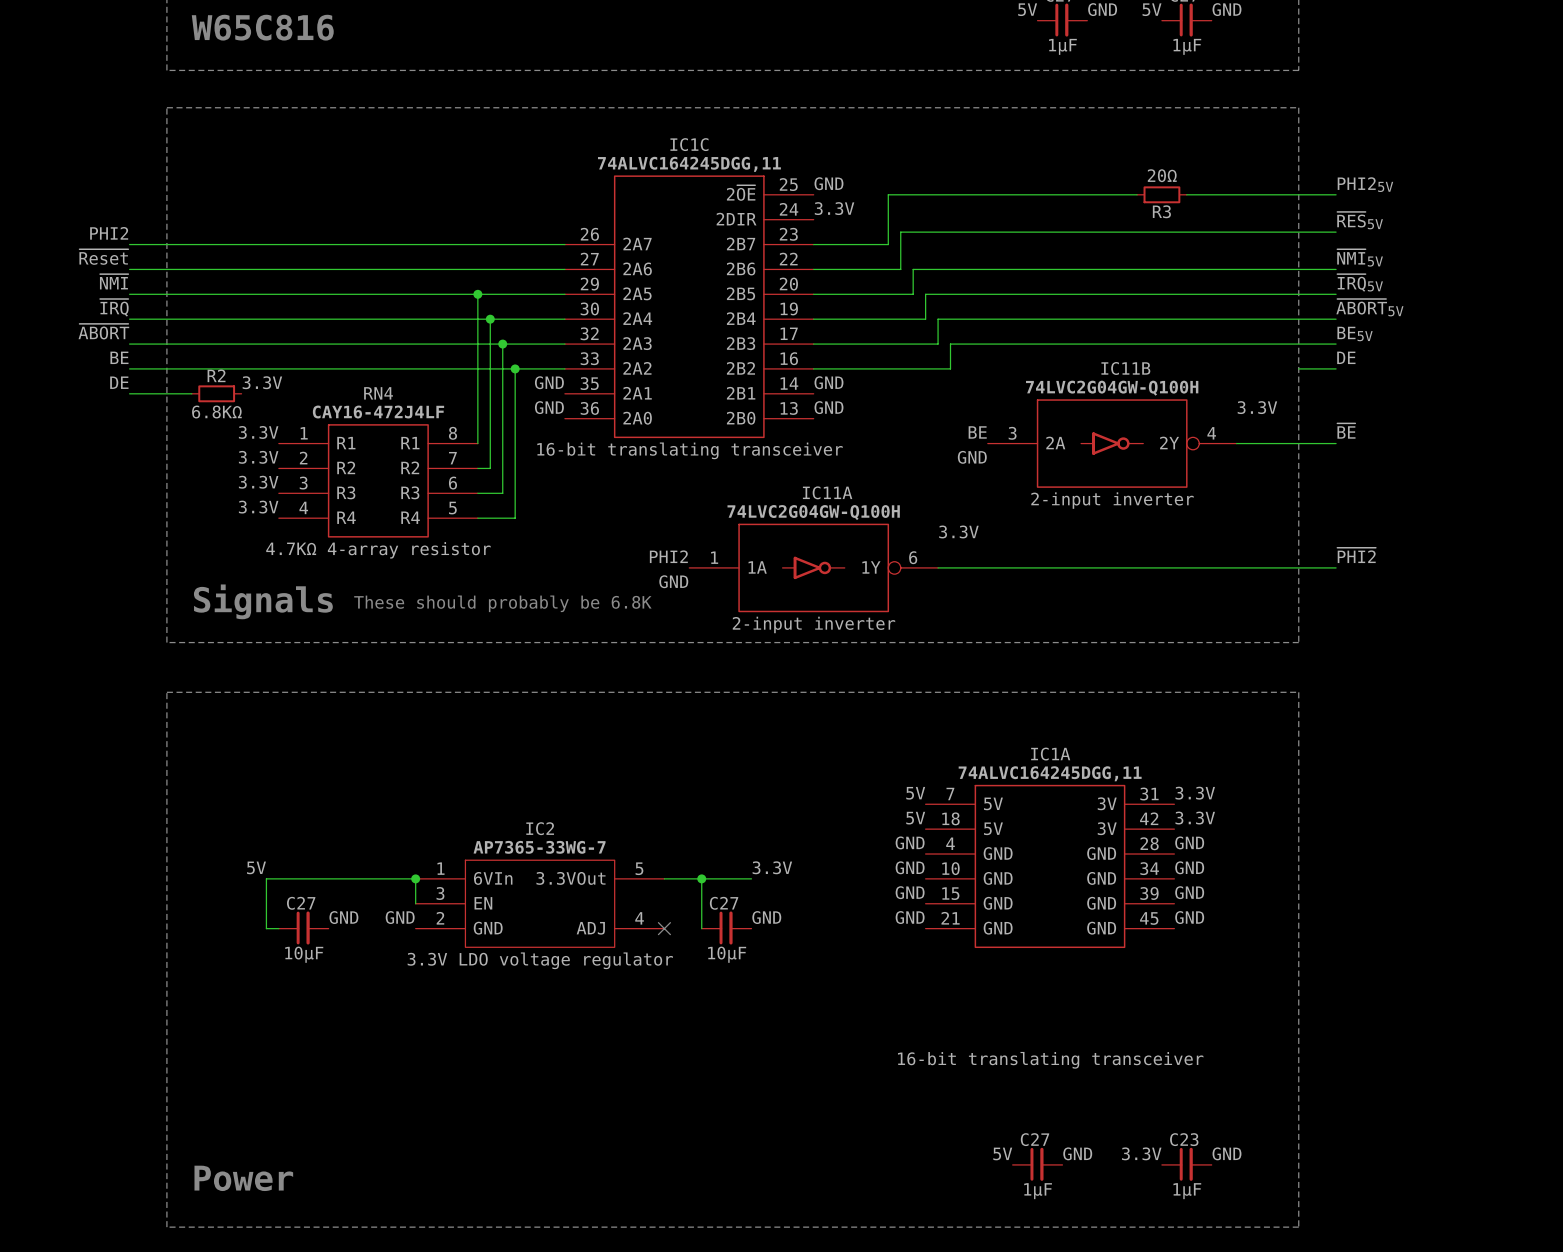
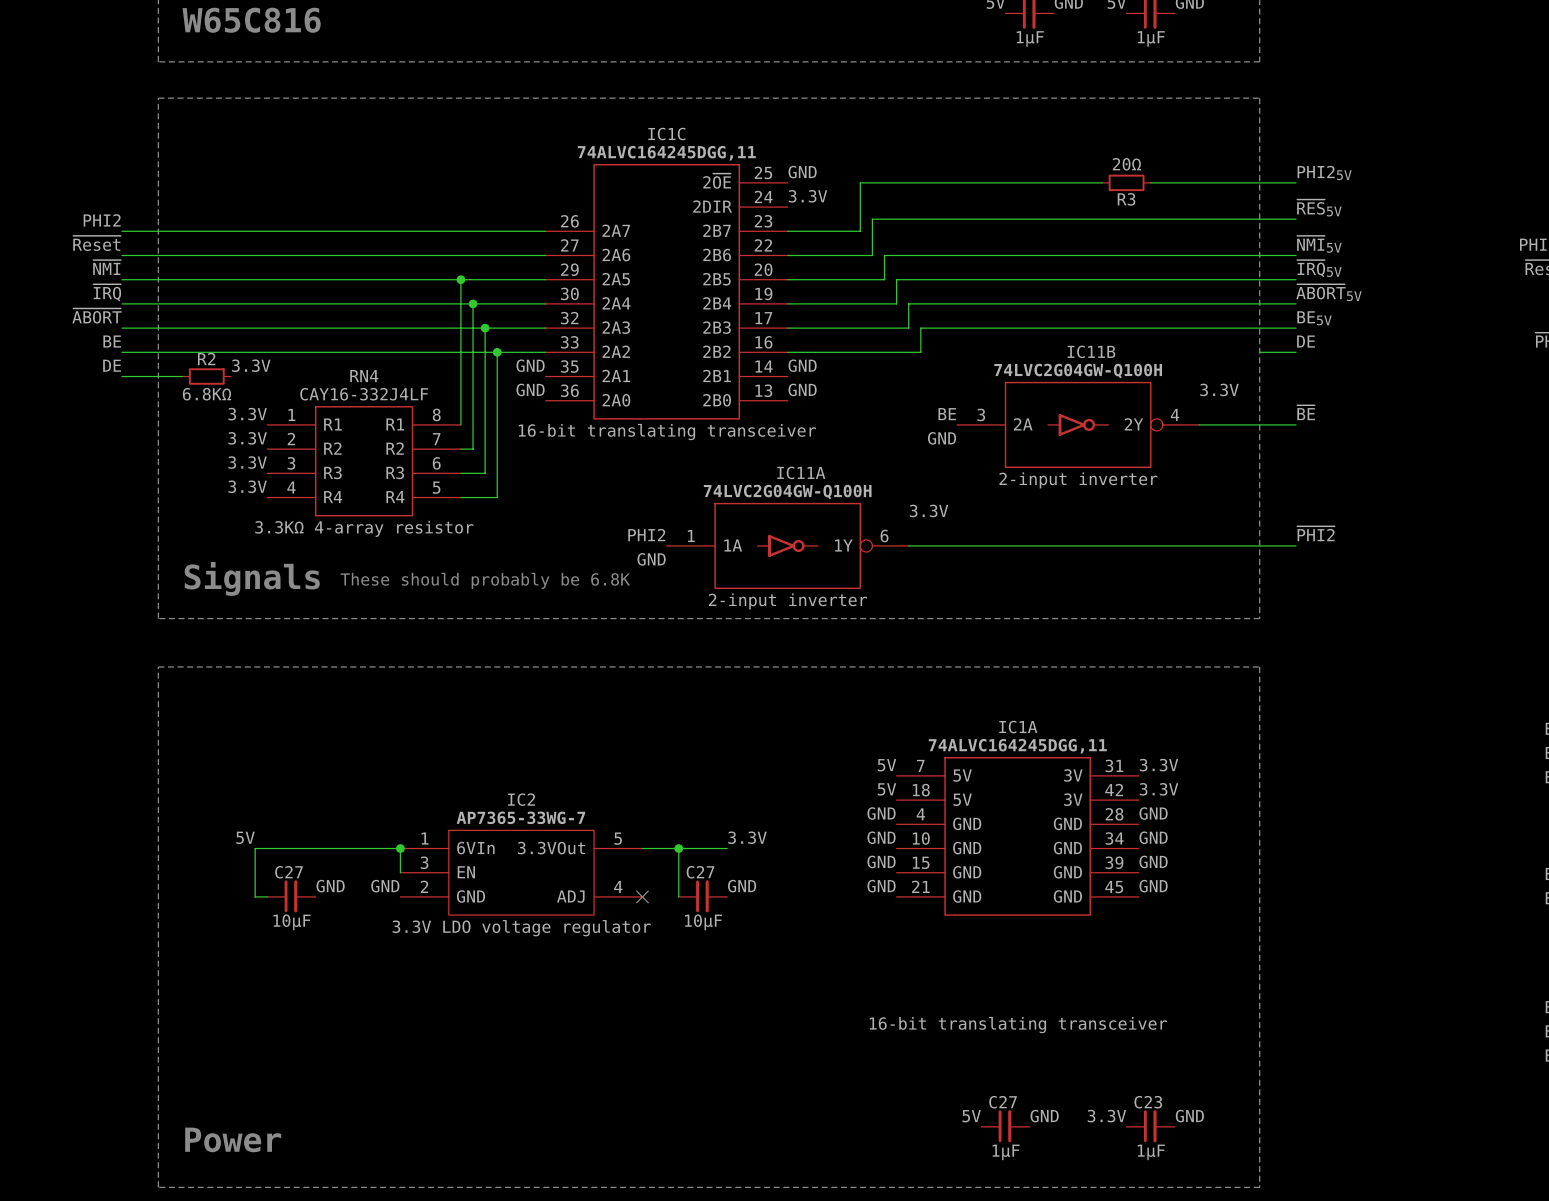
RN4 value: CAY16-472J4LF (378, 412) -> CAY16-332J4LF (364, 394)
RN4 text: 4.7KΩ 4-array resistor (378, 550) -> 3.3KΩ 4-array resistor (364, 528)

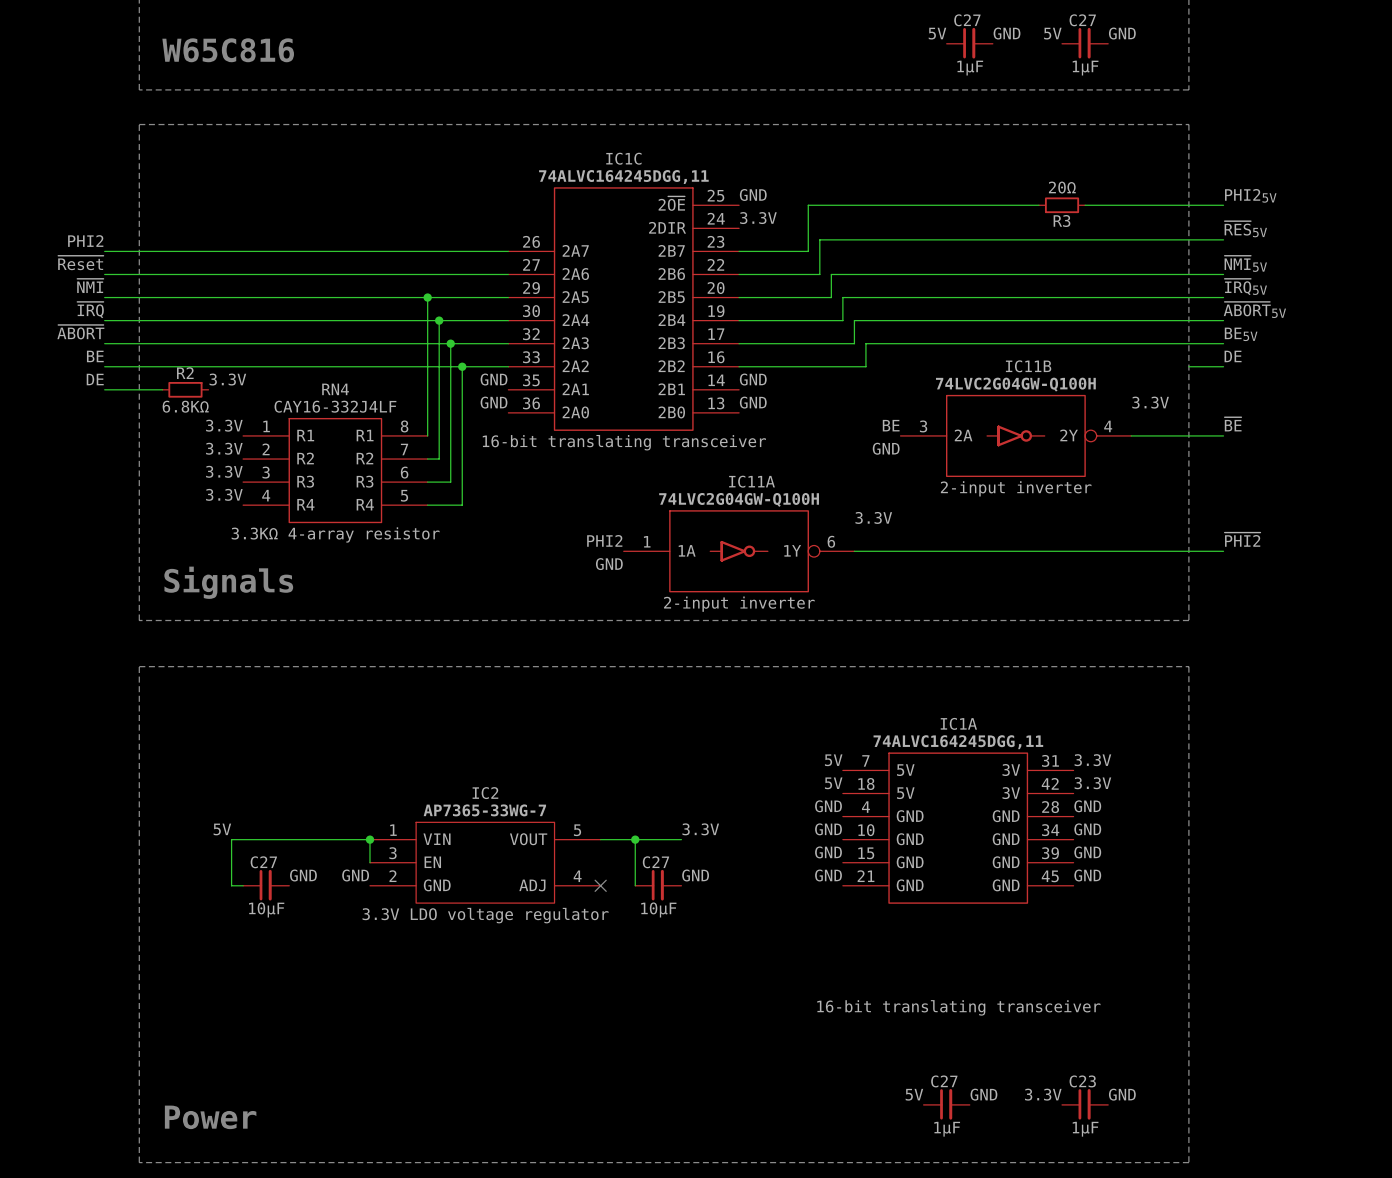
text: These should probably be 6.8K (485, 580) -> none
IC2 pin name: 6VIn (475, 848) -> VIN (437, 839)
IC2 pin name: 3.3VOut (551, 848) -> VOUT (528, 839)

